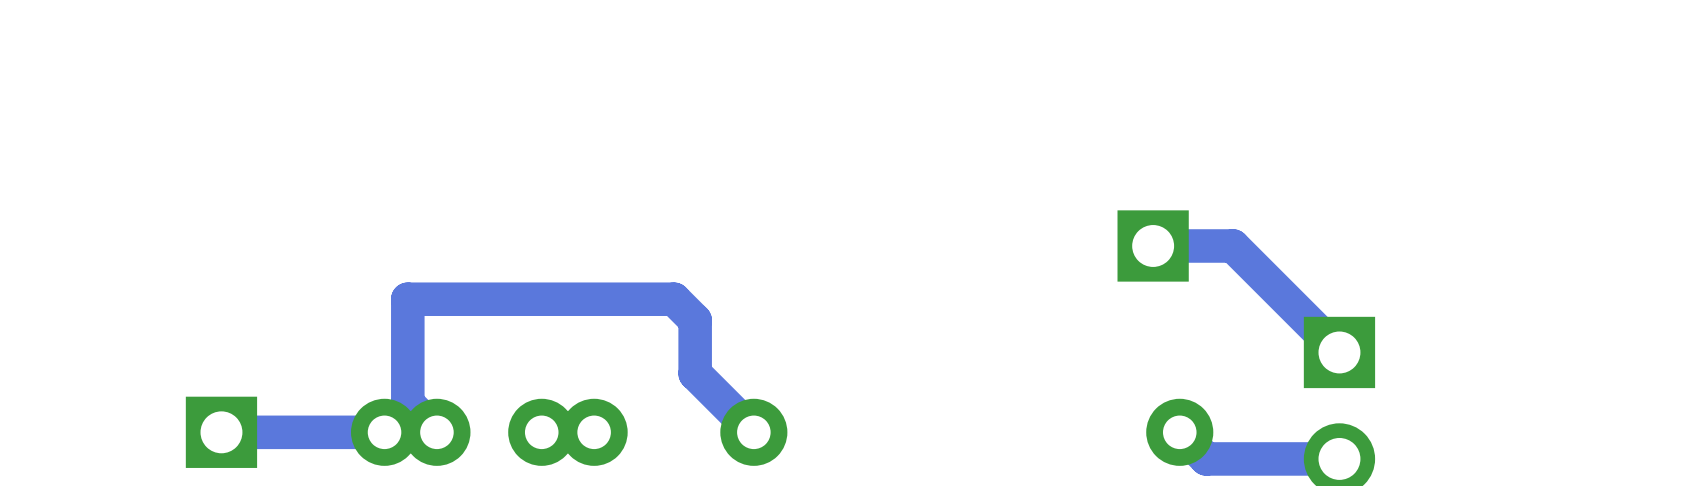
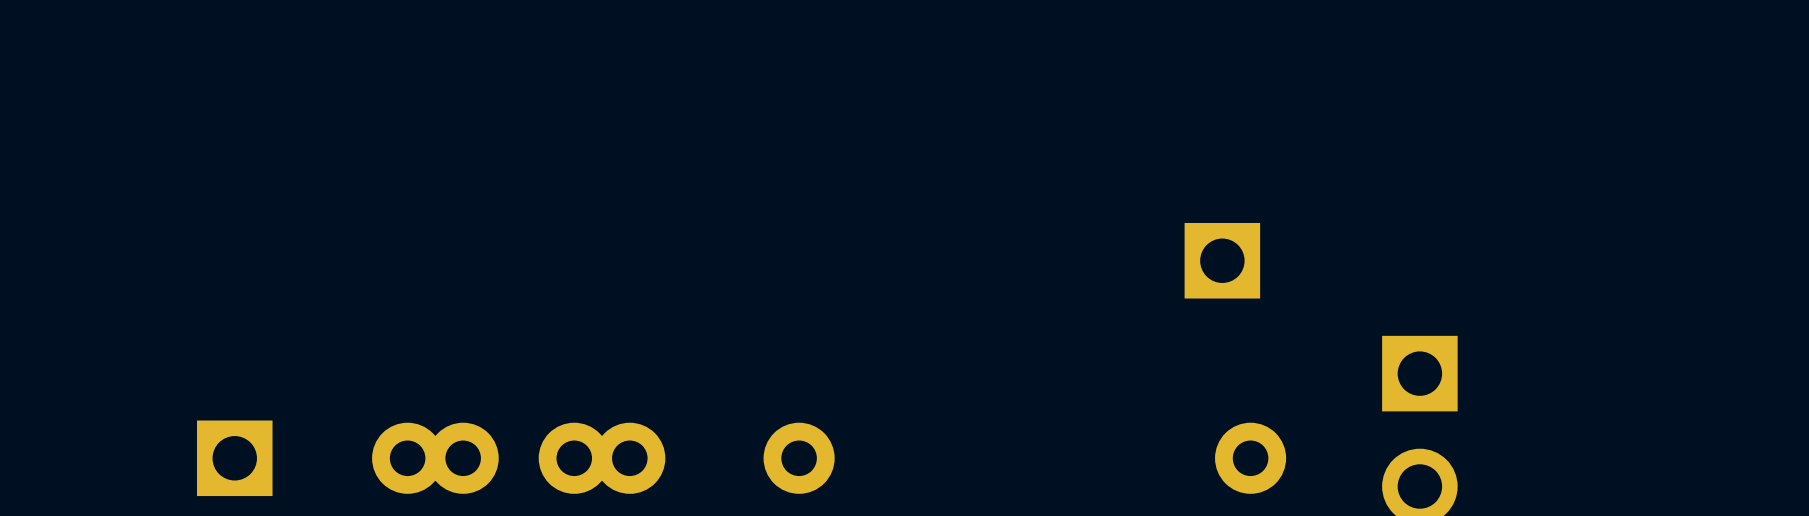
bottom track: (1153, 245) (1232, 245) (1339, 352) -> none
bottom track: (753, 432) (695, 373) (695, 320) (673, 299) (407, 299) (407, 403) (436, 432) (221, 432) -> none
bottom track: (1179, 432) (1206, 458) (1339, 458) -> none

